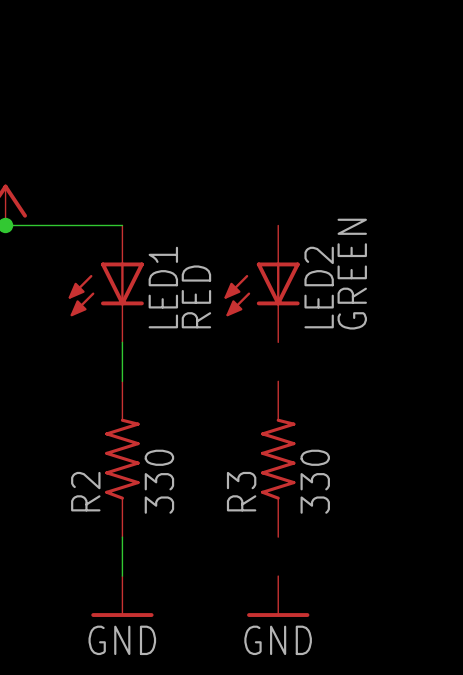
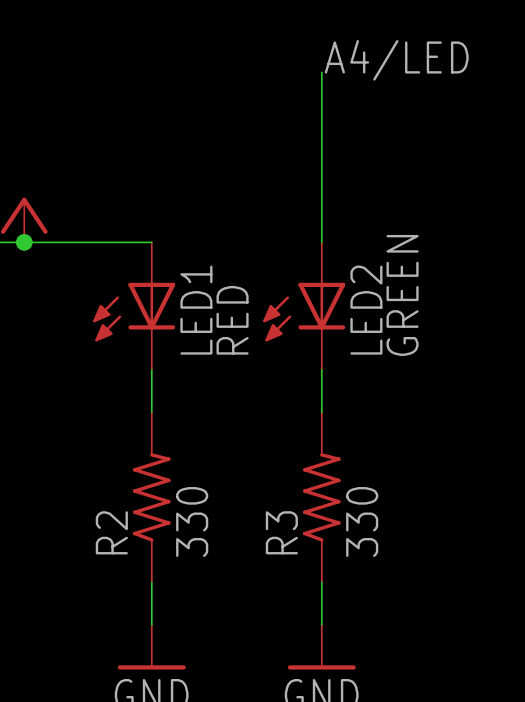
label: none -> A4/LED (396, 60)
wire: none -> (321, 72) (321, 242)
wire: none -> (321, 369) (321, 412)
wire: none -> (321, 582) (321, 624)

